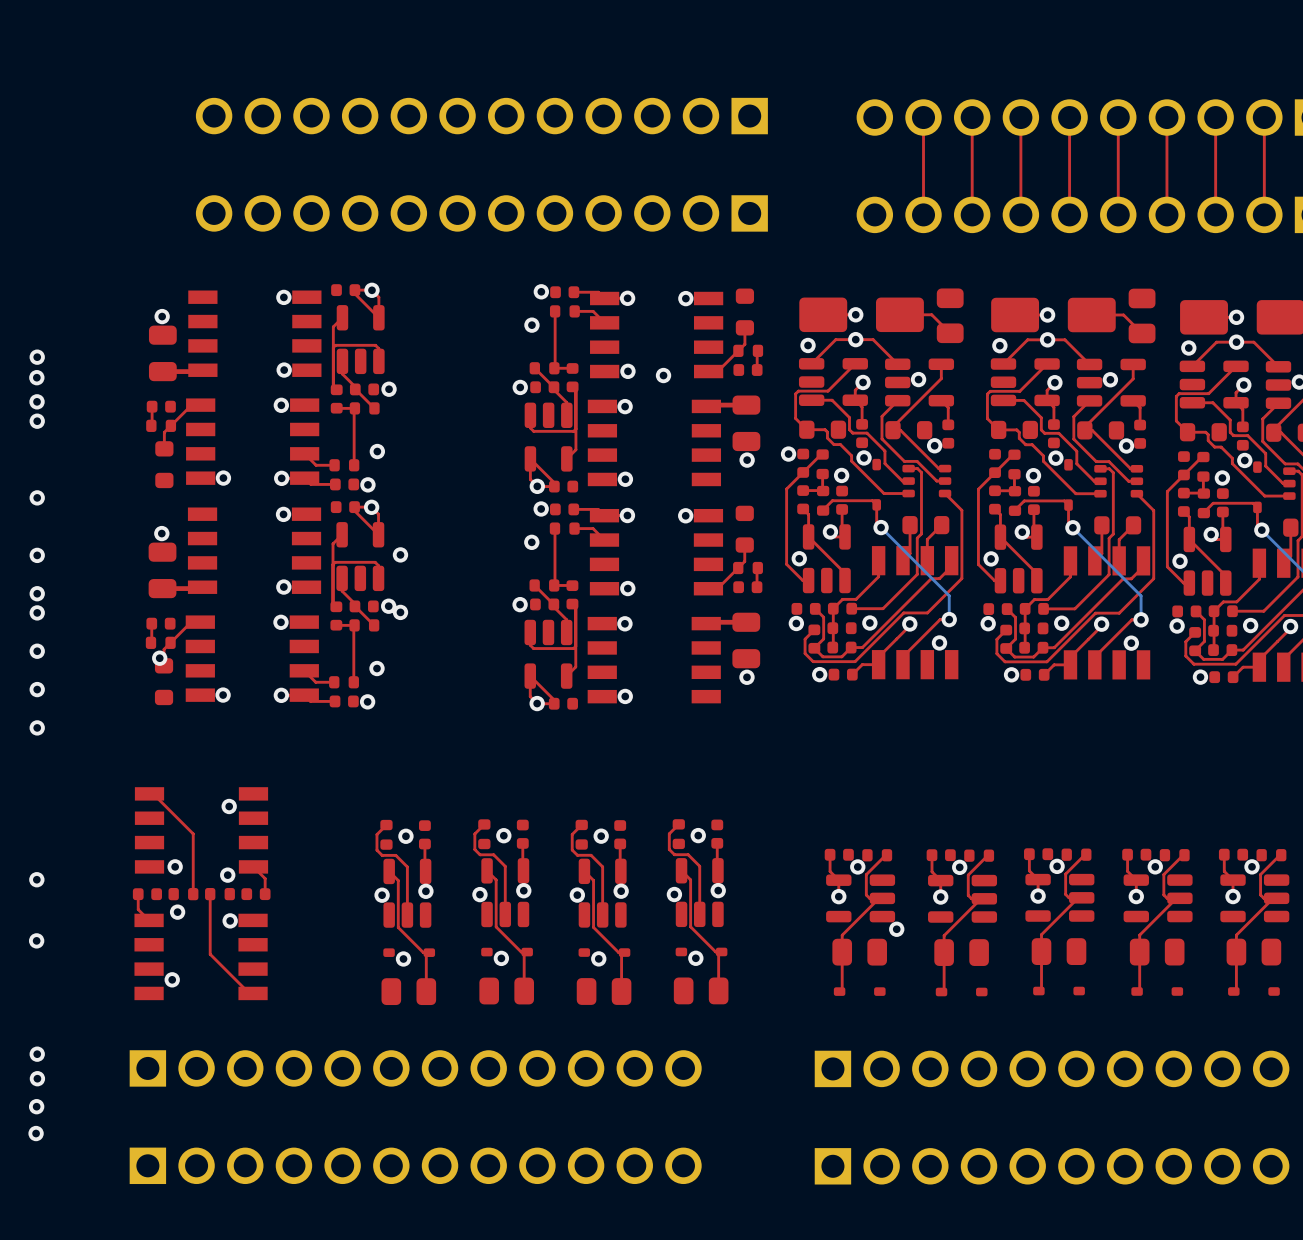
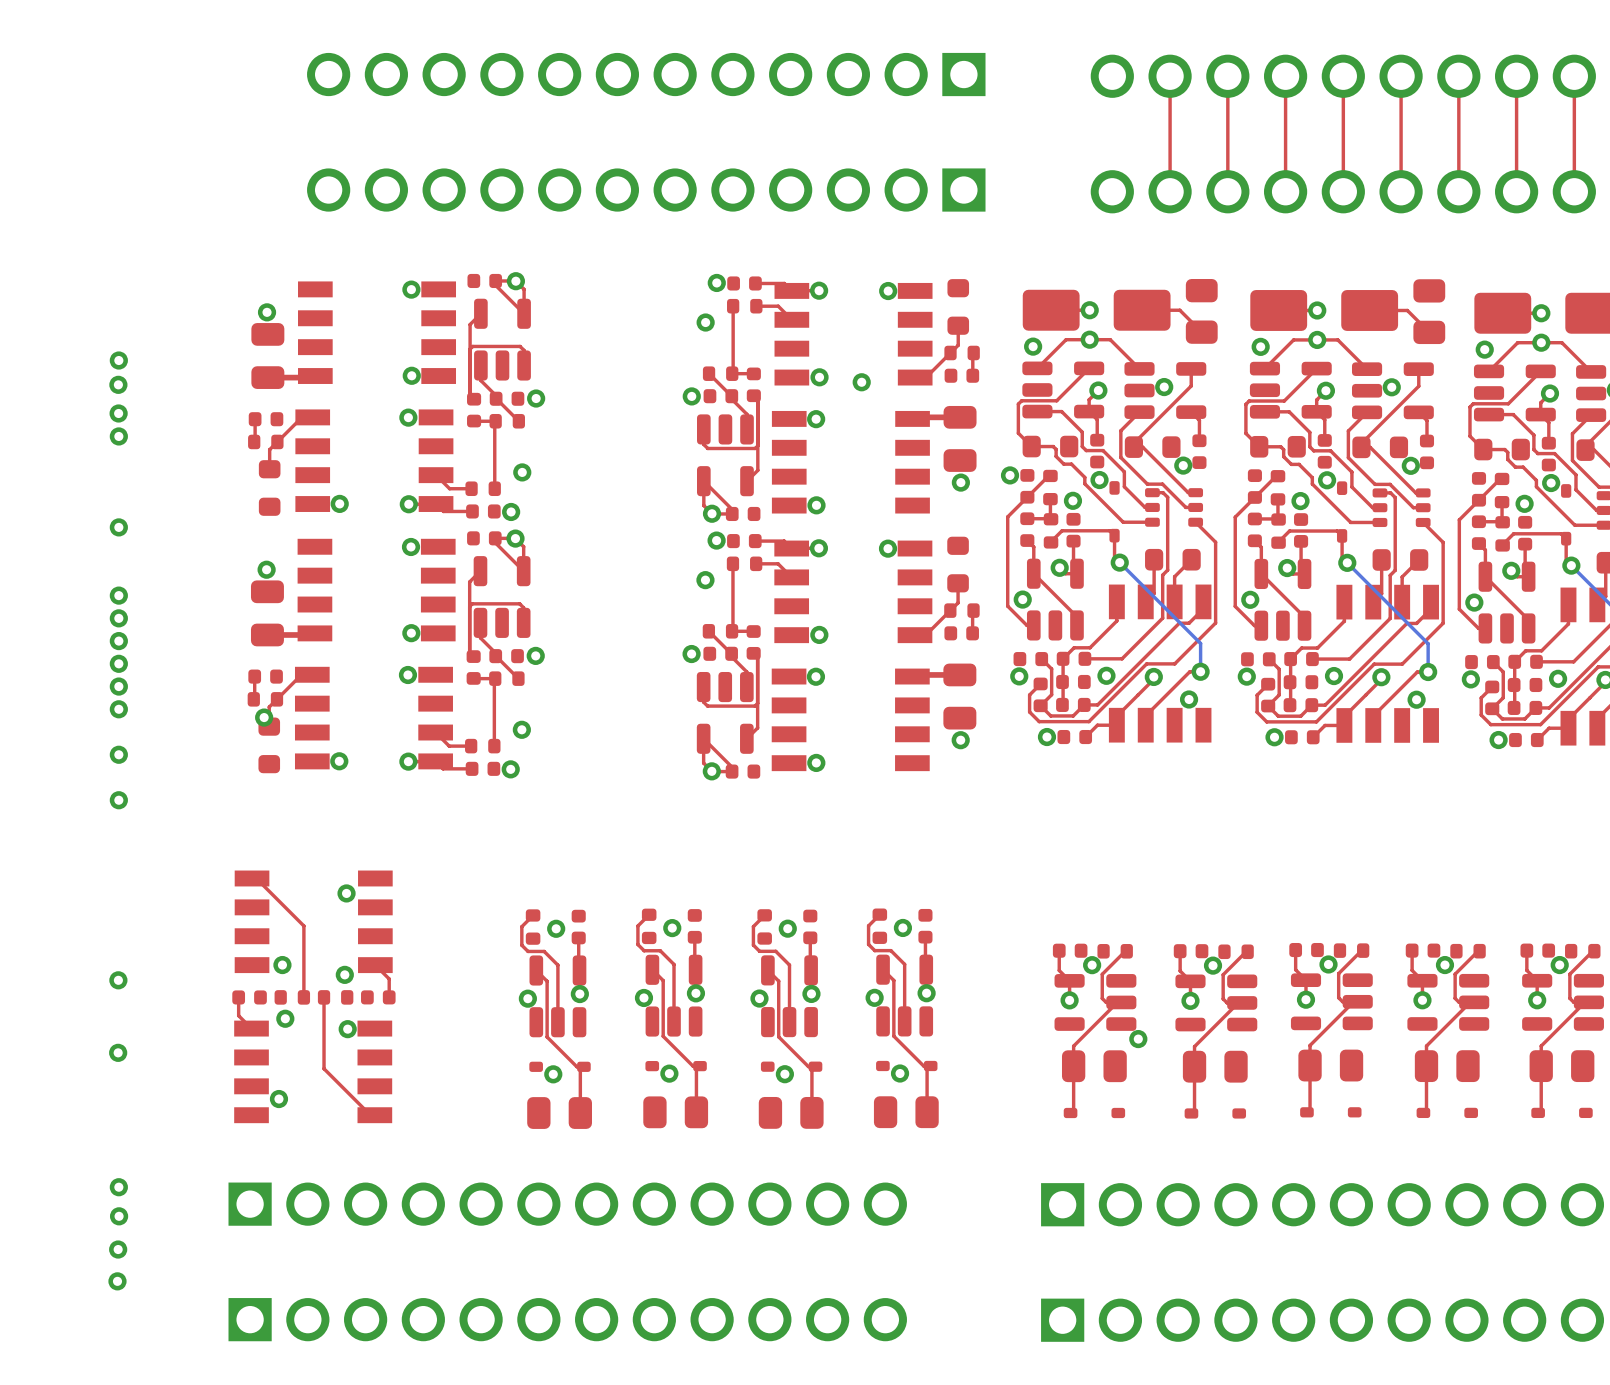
via: (400, 554) -> none
via: none -> (118, 618)
via: (400, 612) -> none
via: none -> (118, 686)

